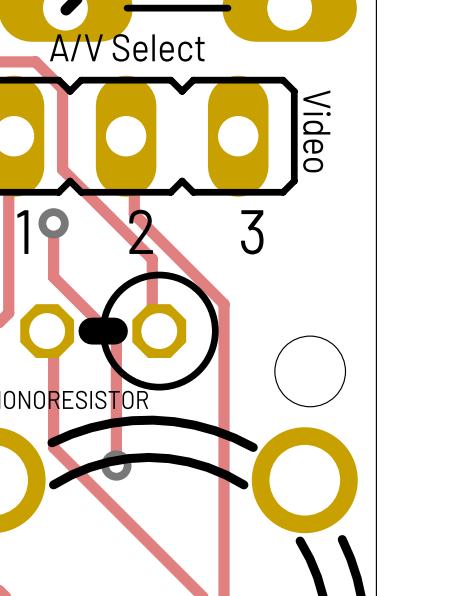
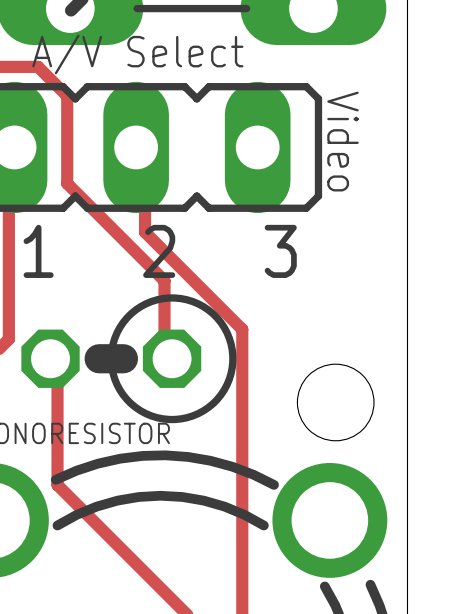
track: (53, 223) (53, 277) (116, 339) (116, 465) -> none
via: (53, 223) -> none
via: (116, 465) -> none

